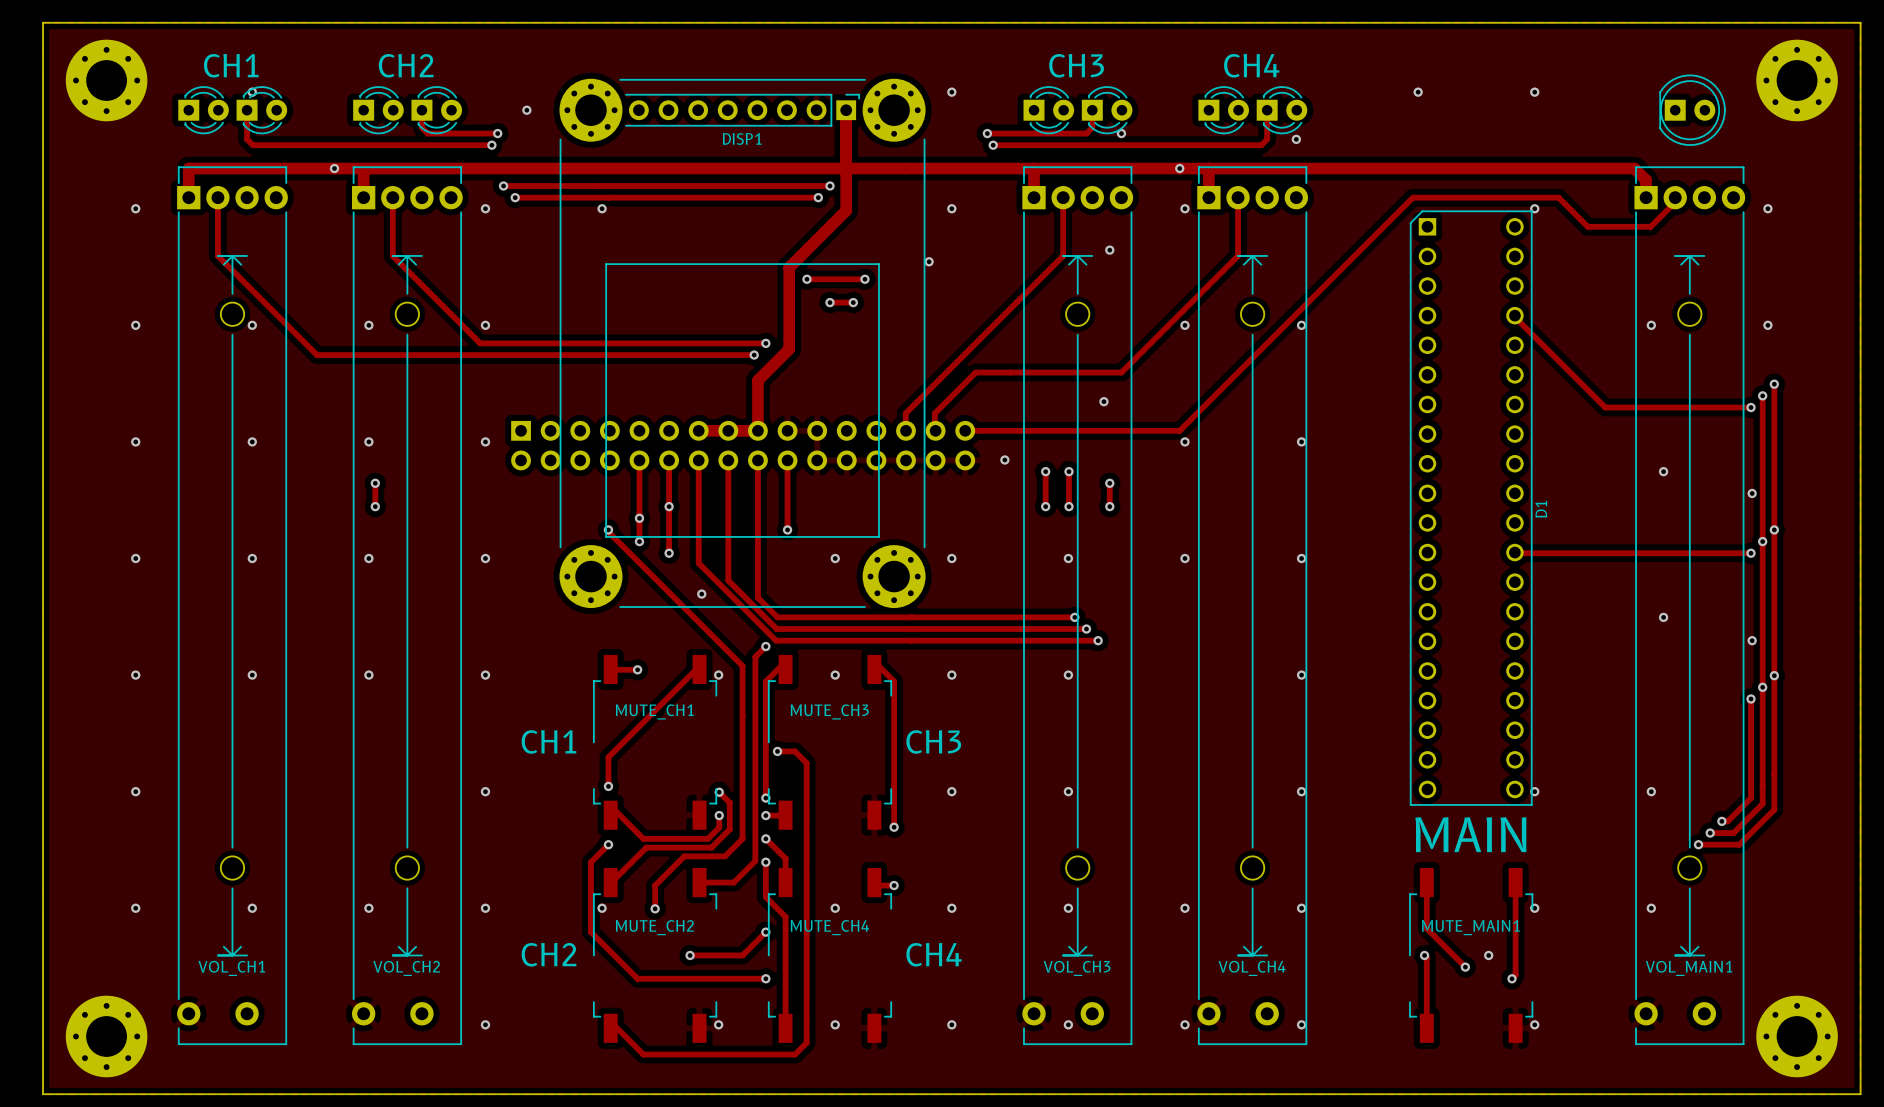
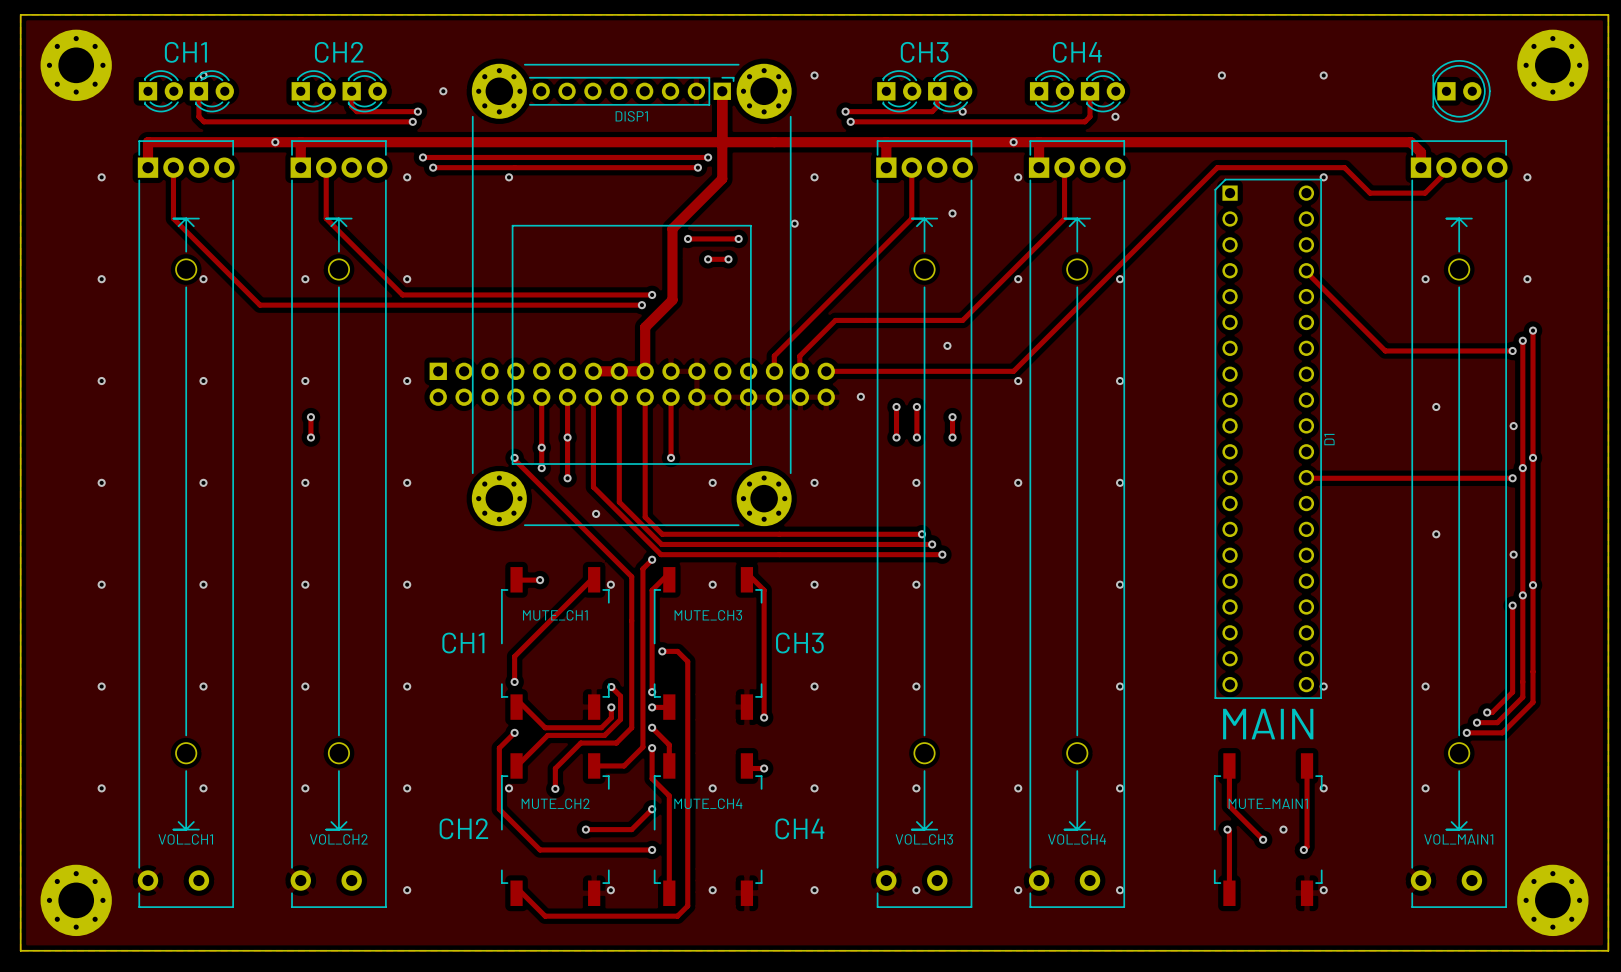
via: none -> (203, 686)
via: none -> (305, 686)

